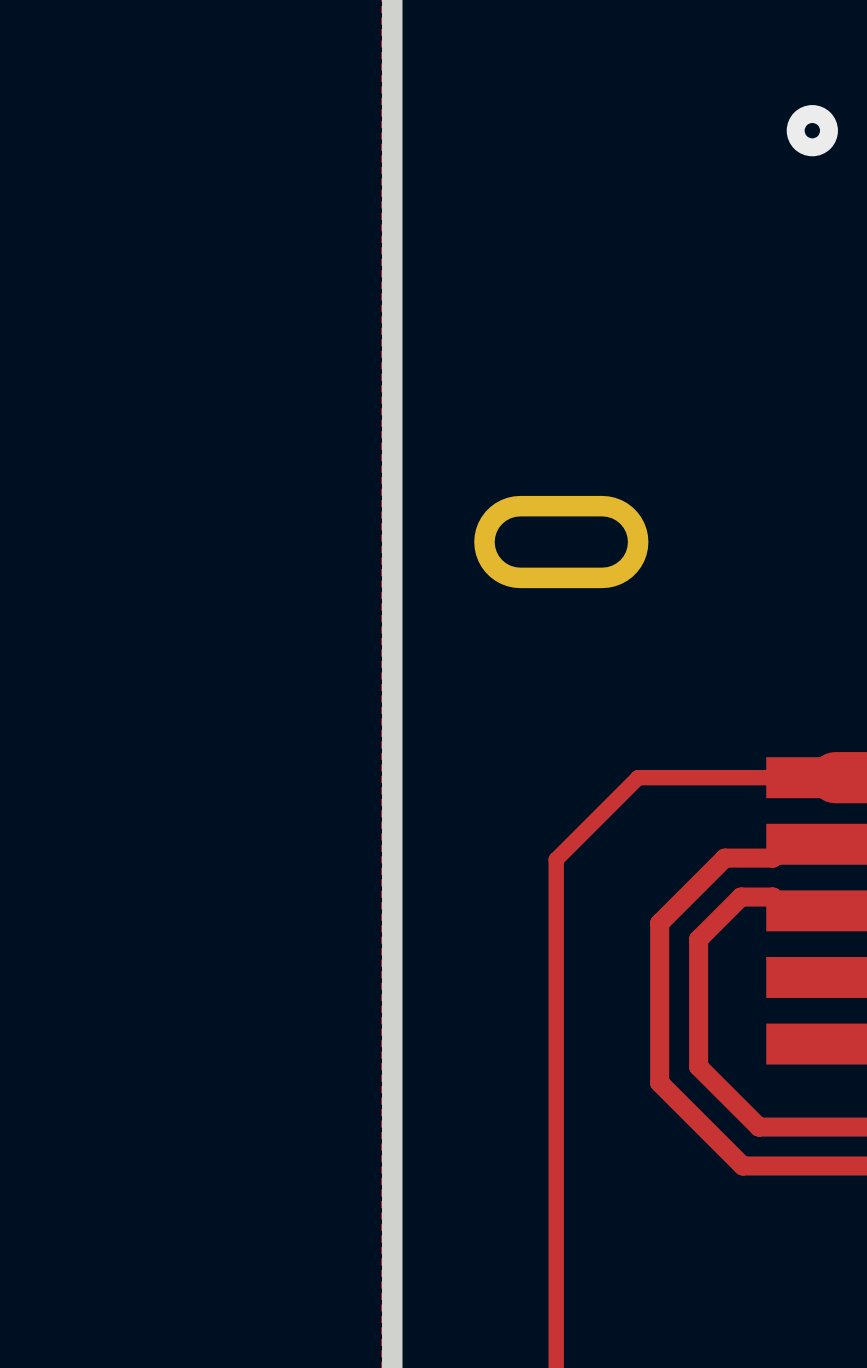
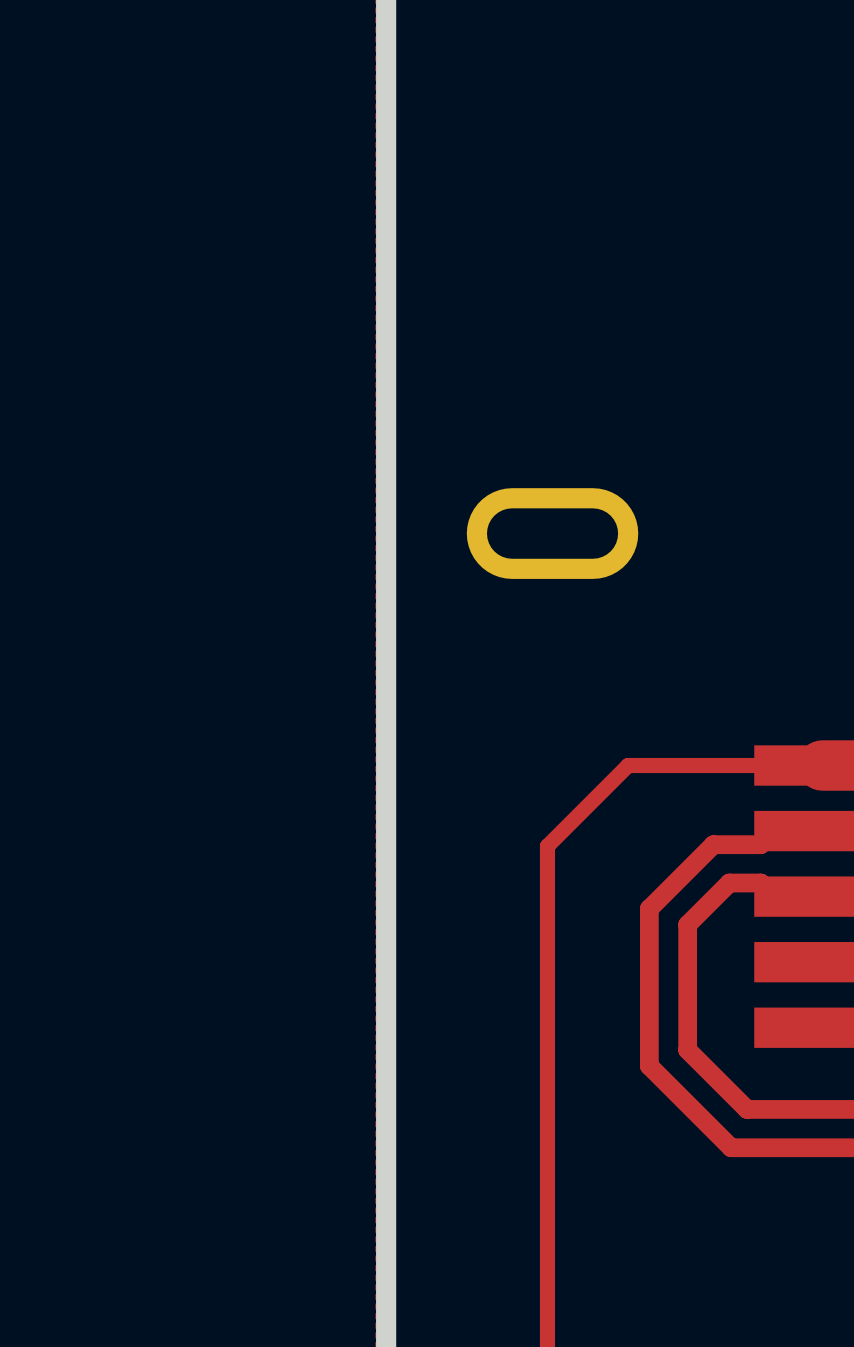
via: (812, 130) -> none

